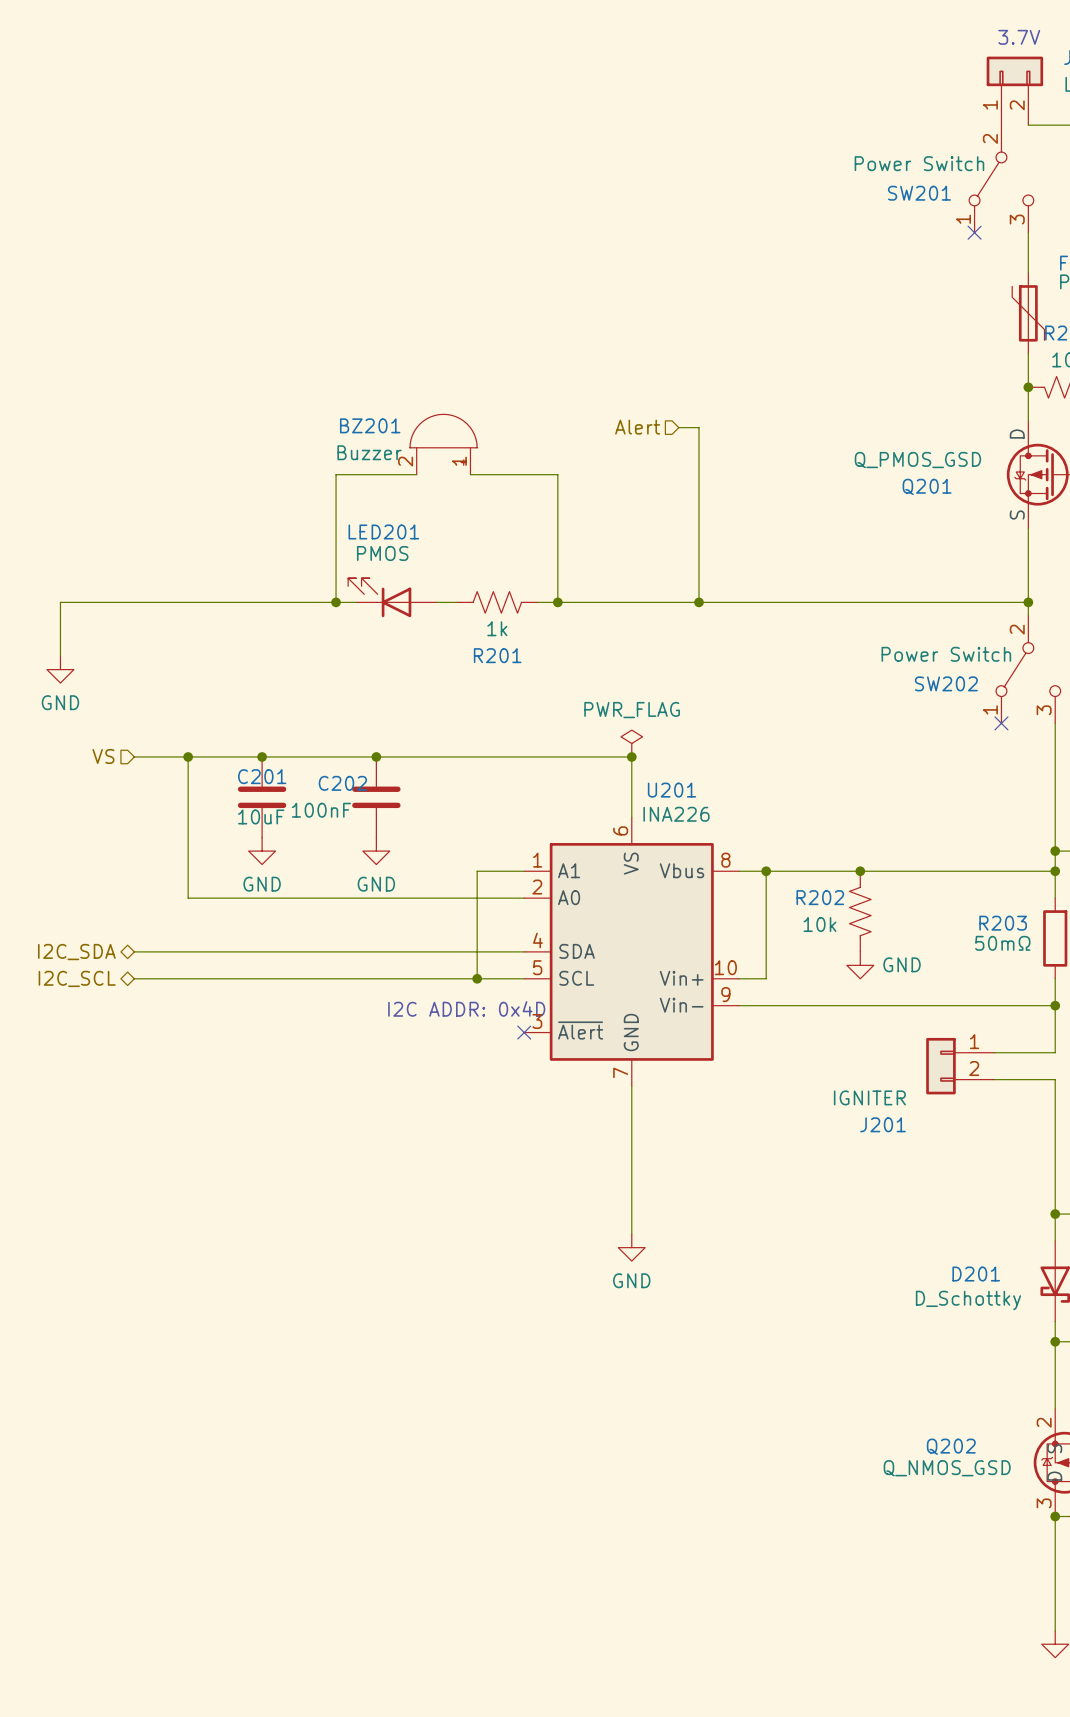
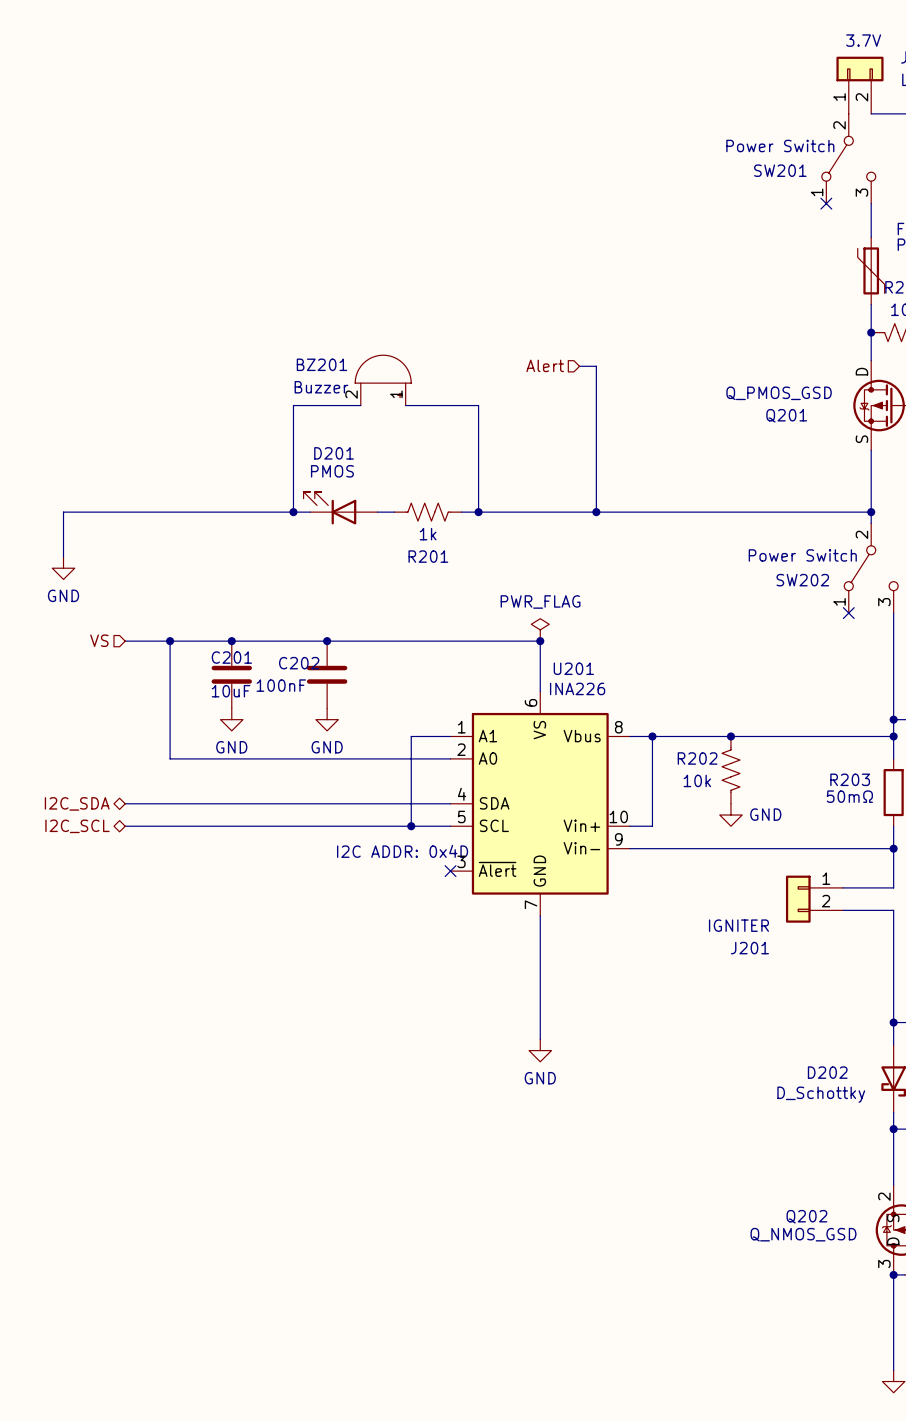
LED201 name: LED201 (383, 531) -> D201 (334, 453)
D201 name: D201 (976, 1274) -> D202 (827, 1072)

